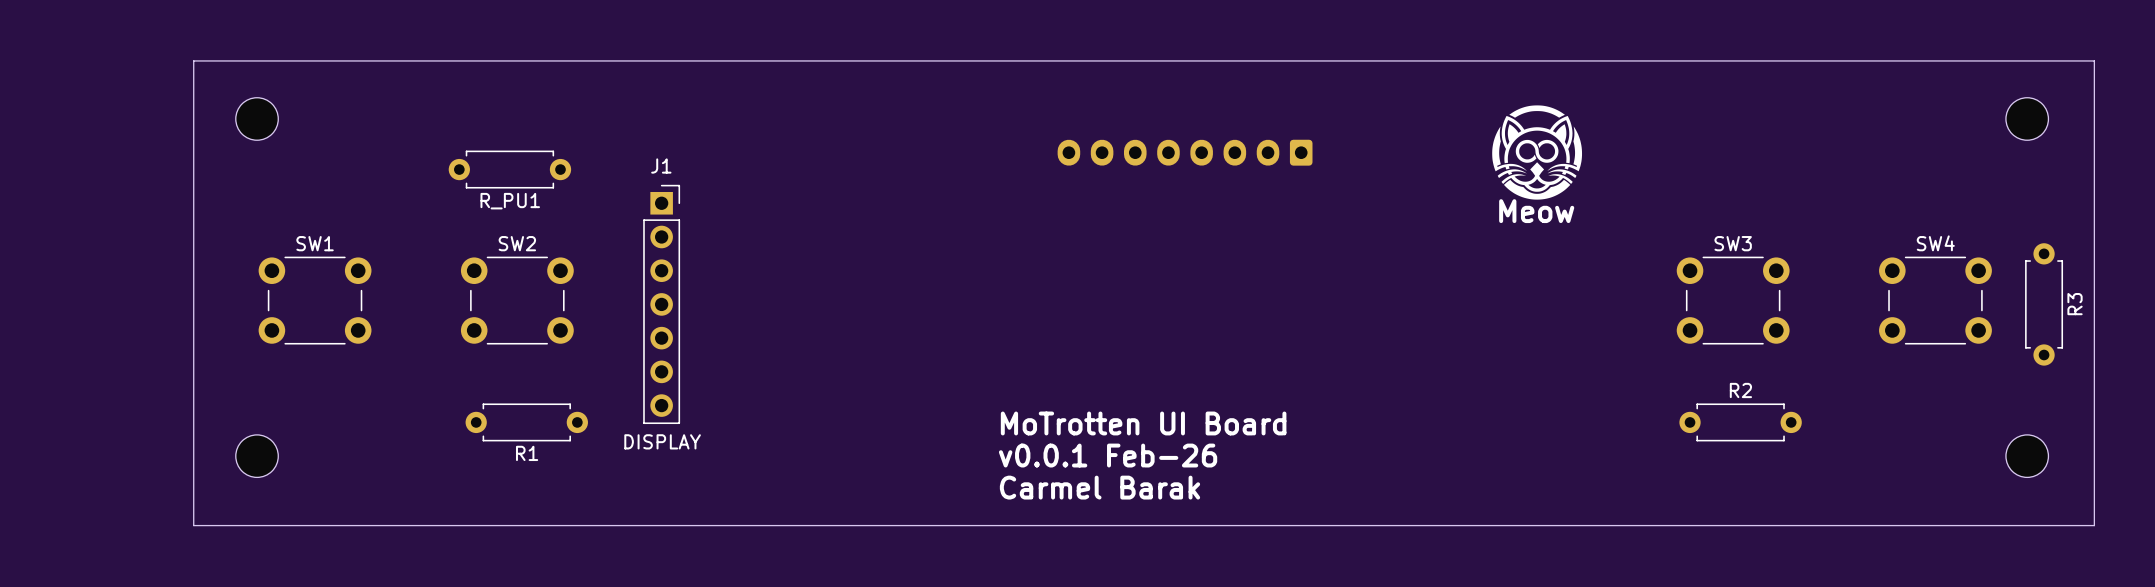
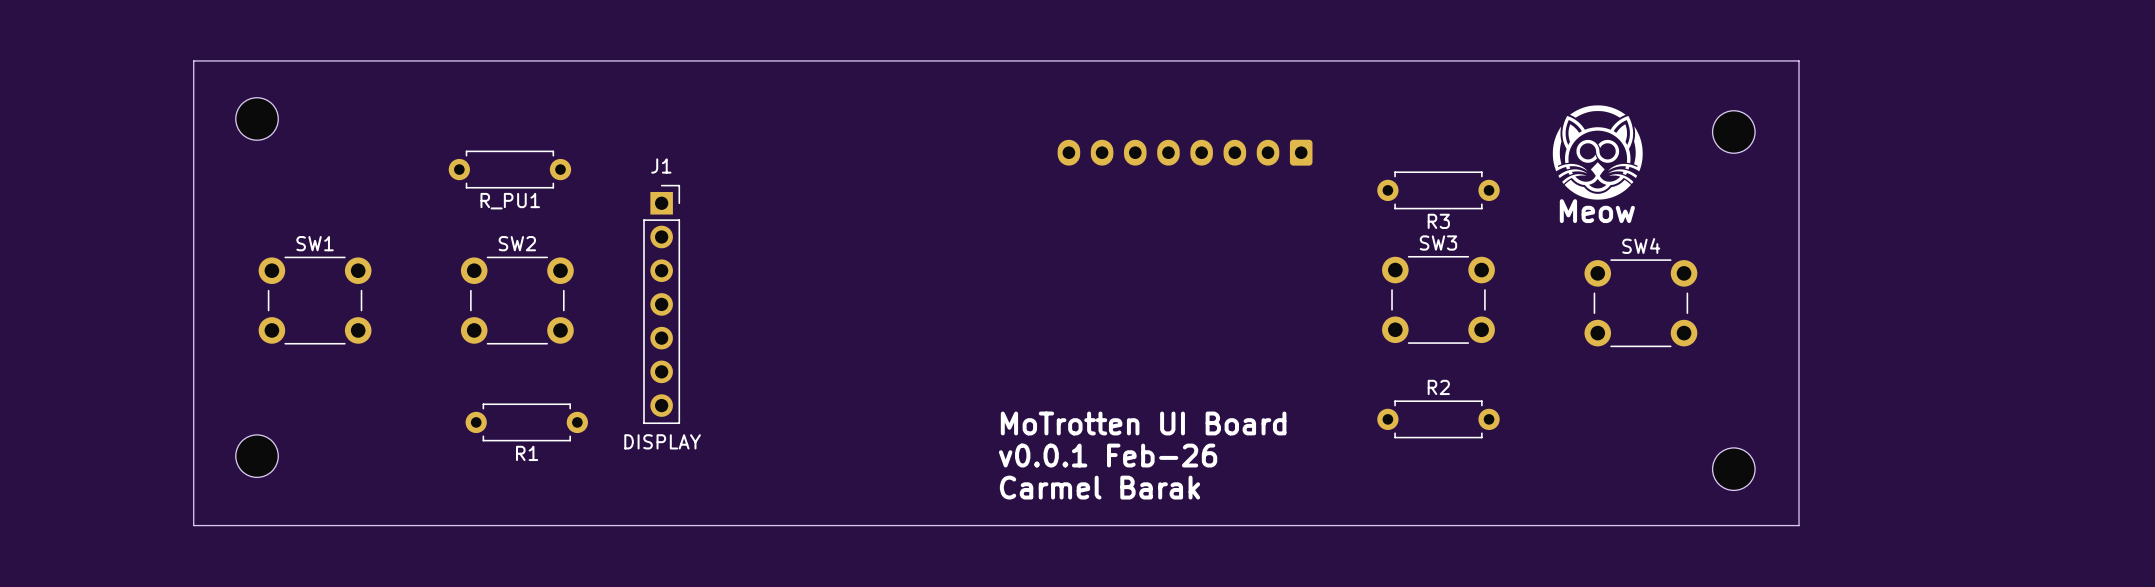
board edge: (1799, 60) (2094, 60) (2094, 525) (1799, 525) -> (1799, 60) (1799, 525)
part: (2027, 118) -> none
part: none -> (1733, 131)
drawing position: (1537, 152) -> (1597, 152)
text position: Meow (1536, 211) -> Meow (1597, 211)
SW3 position: (1733, 300) -> (1438, 299)
SW4 position: (1935, 300) -> (1640, 303)
R3 rotation: 0° (2044, 304) -> 90° clockwise (1438, 190)
R3 position: (2044, 304) -> (1438, 190)
R2 position: (1740, 422) -> (1438, 419)
part: (2027, 456) -> none
part: none -> (1733, 469)

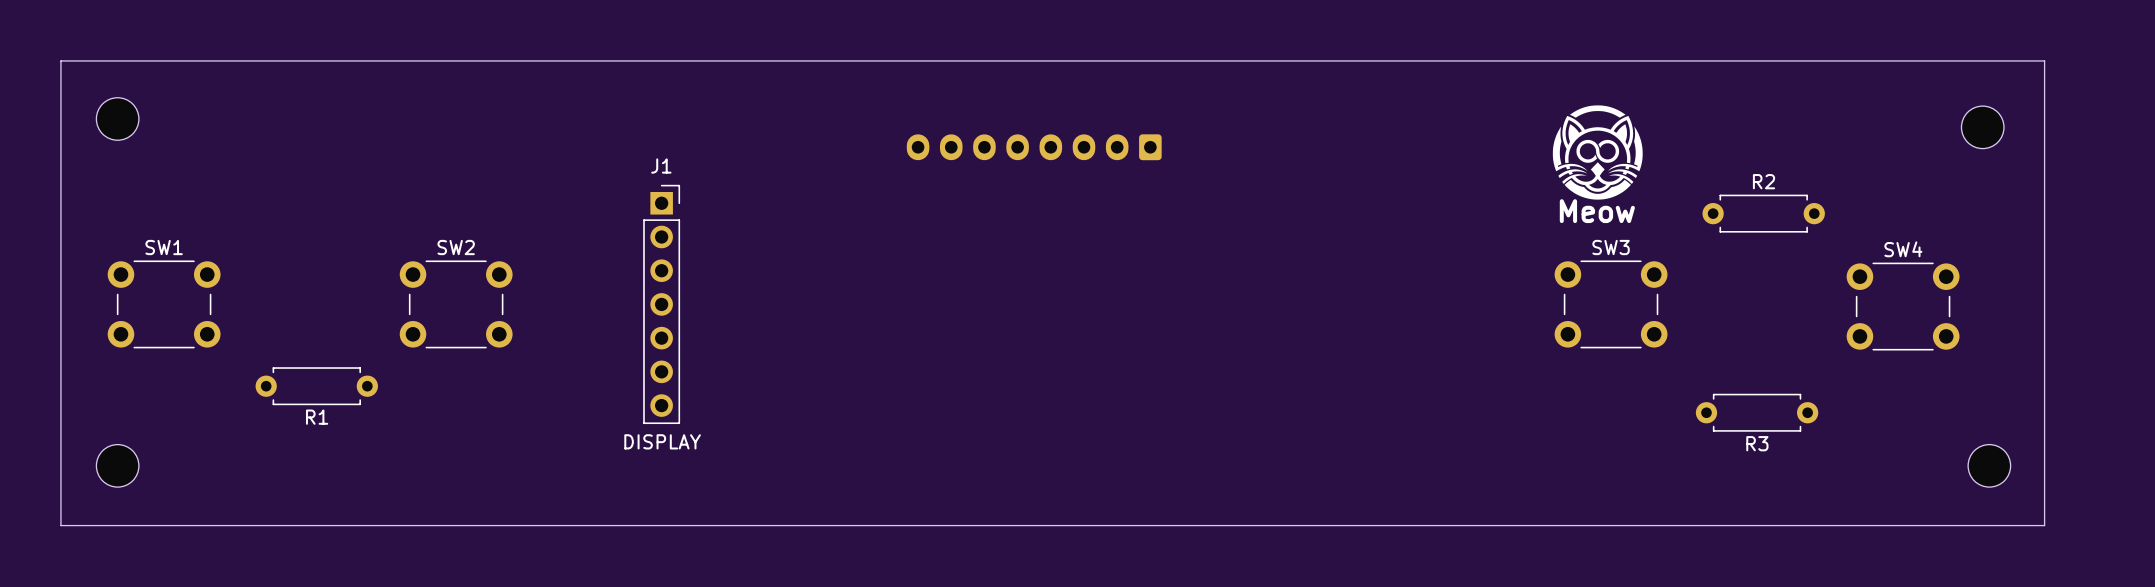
board edge: (193, 60) (193, 525) -> (193, 60) (60, 60) (60, 525) (193, 525)
board edge: (1799, 60) (1799, 525) -> (1799, 60) (2044, 60) (2044, 525) (1799, 525)
part position: (257, 118) -> (117, 118)
part: none -> (1982, 127)
part: (1733, 131) -> none
part position: (1185, 152) -> (1034, 147)
R_PU1: (509, 169) -> none
R3 position: (1438, 190) -> (1757, 412)
SW3 position: (1438, 299) -> (1611, 304)
SW1 position: (315, 300) -> (164, 304)
SW2 position: (517, 300) -> (456, 304)
SW4 position: (1640, 303) -> (1903, 306)
R2 position: (1438, 419) -> (1763, 213)
R1 position: (526, 422) -> (316, 386)
text: MoTrotten UI Board (1143, 423) -> none
text: v0.0.1 Feb-26 (1108, 455) -> none
part position: (257, 456) -> (117, 465)
part: none -> (1989, 465)
part: (1733, 469) -> none
text: Carmel Barak (1099, 487) -> none

